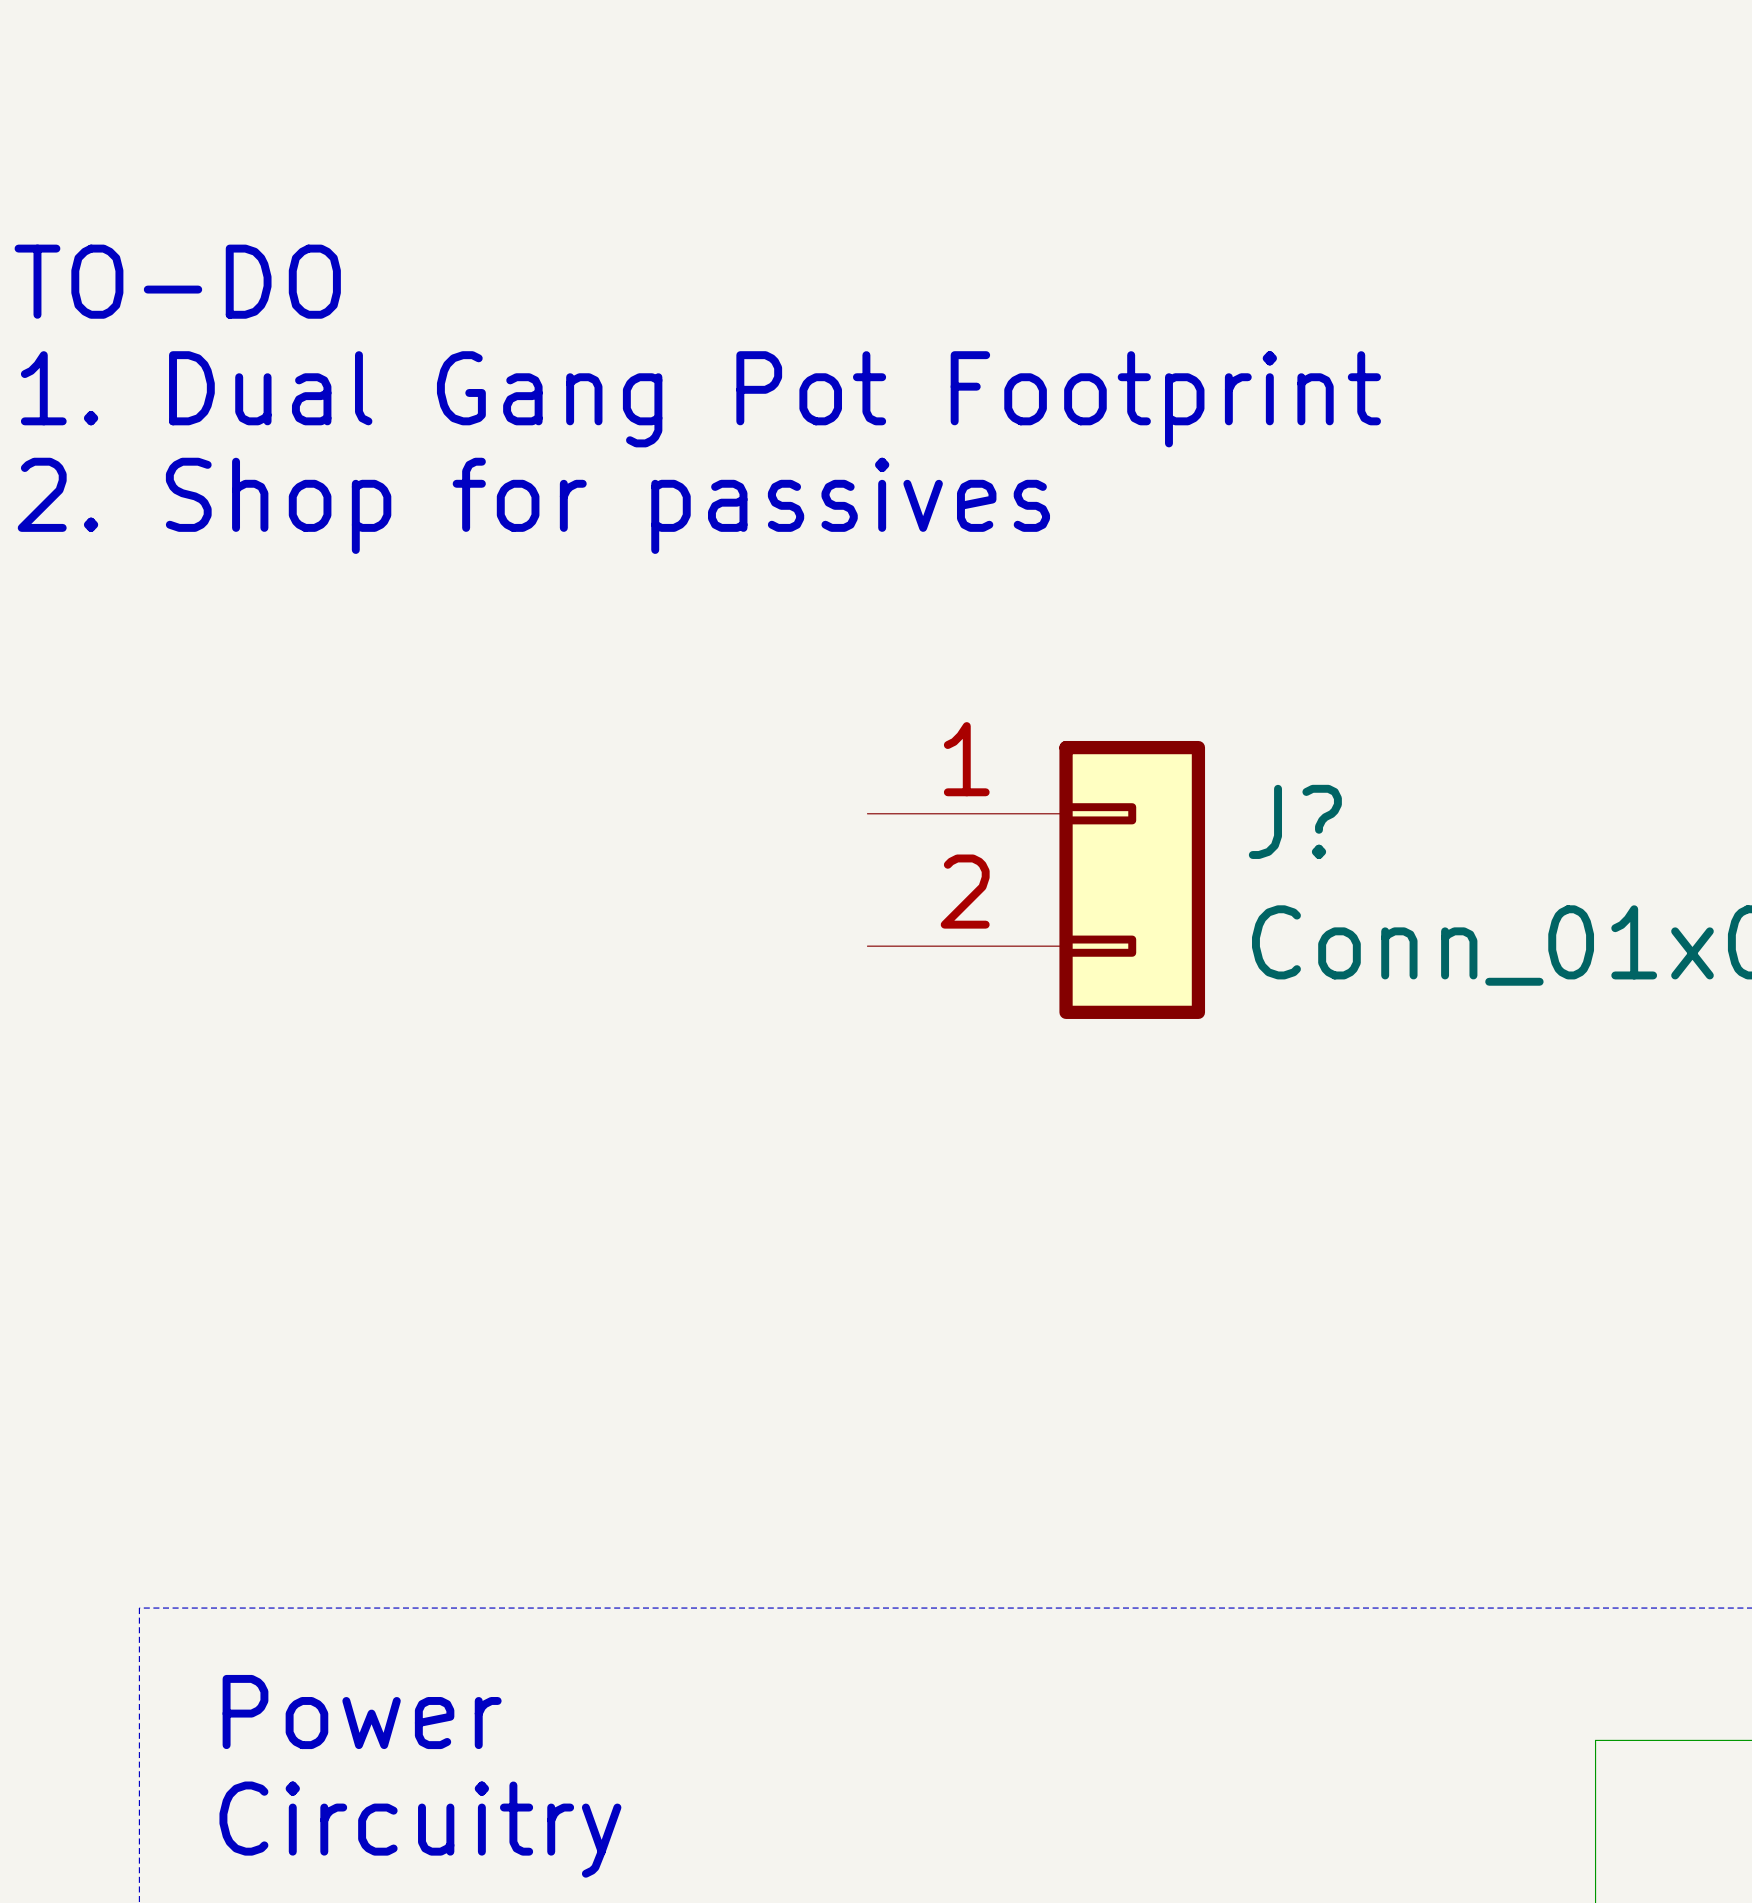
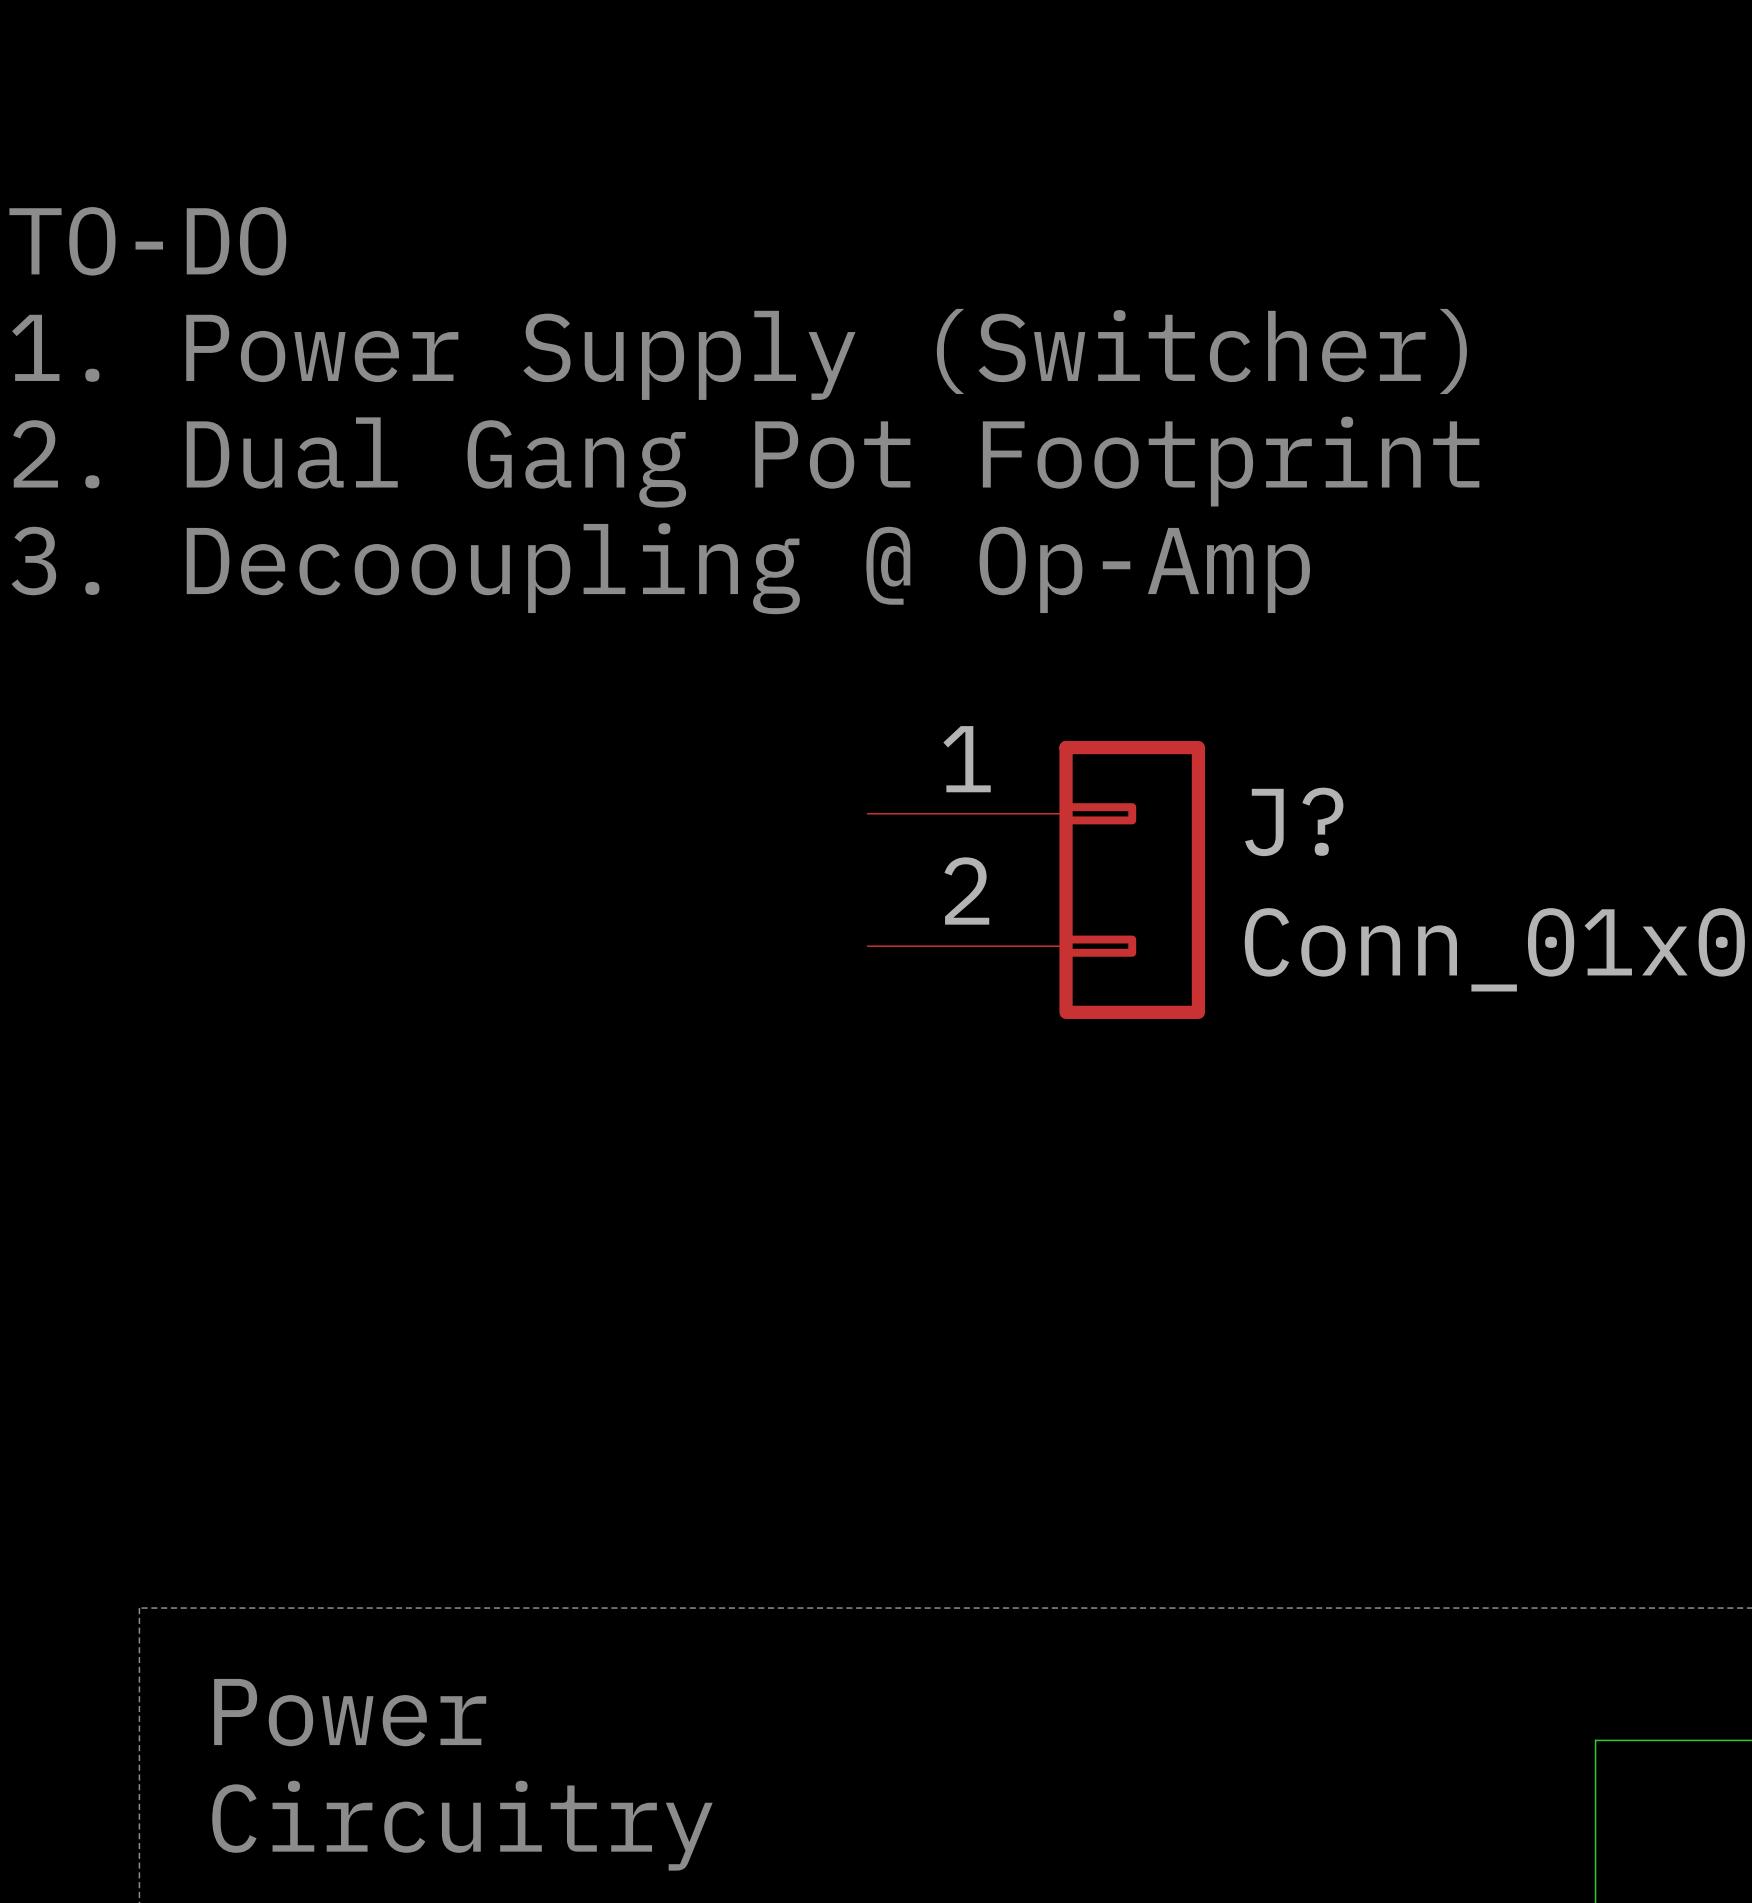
text position: TO-DO (177, 281) -> TO-DO (147, 241)
text: none -> 1. Power Supply (Switcher) (739, 354)
text: 1. Dual Gang Pot Footprint (700, 399) -> 2. Dual Gang Pot Footprint (746, 462)
text: 2. Shop for passives (533, 505) -> none
text: none -> 3. Decooupling @ Op-Amp (660, 568)

